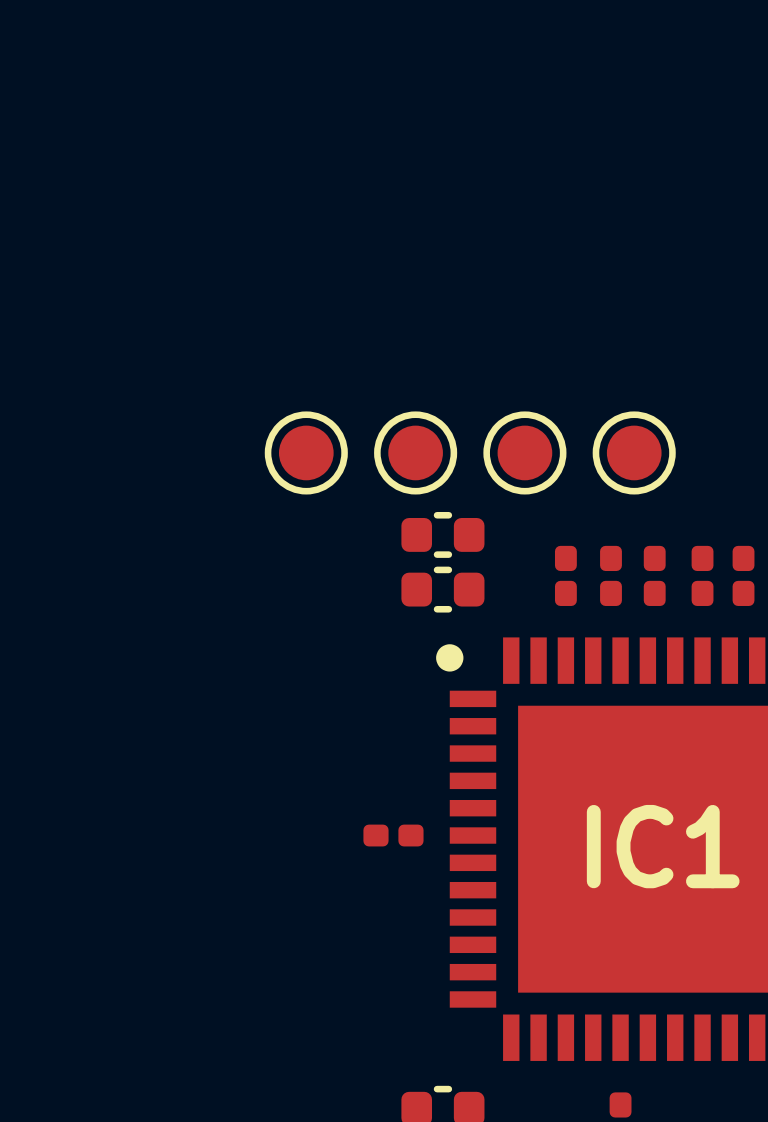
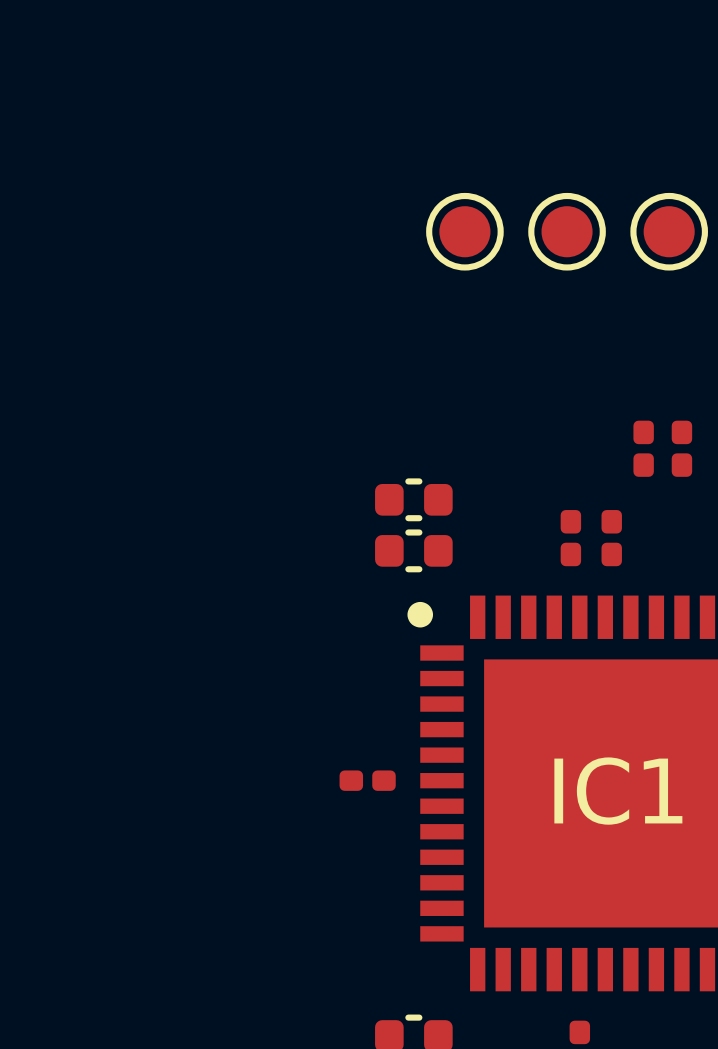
part: none -> (464, 231)
part: none -> (567, 231)
part: none -> (669, 231)
part: (306, 452) -> none
part: (415, 452) -> none
part: (524, 452) -> none
part: (634, 452) -> none
part: none -> (643, 448)
part: none -> (681, 448)
part: (565, 575) -> none
part: (702, 575) -> none
part: (743, 575) -> none

